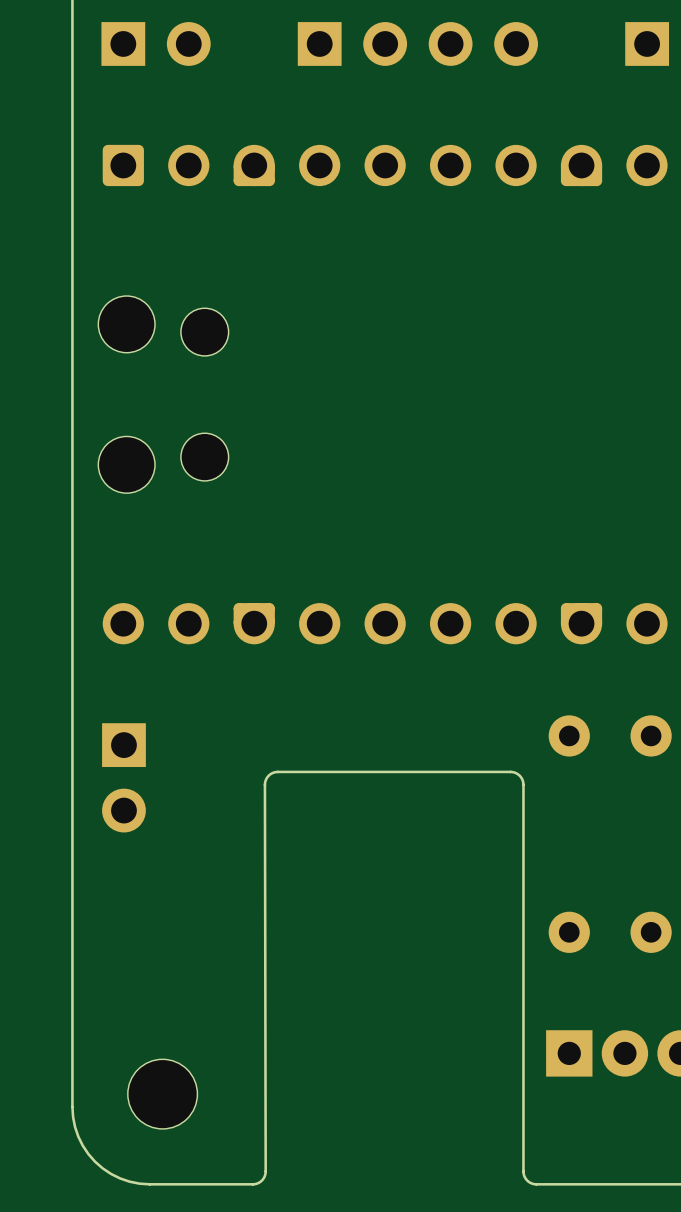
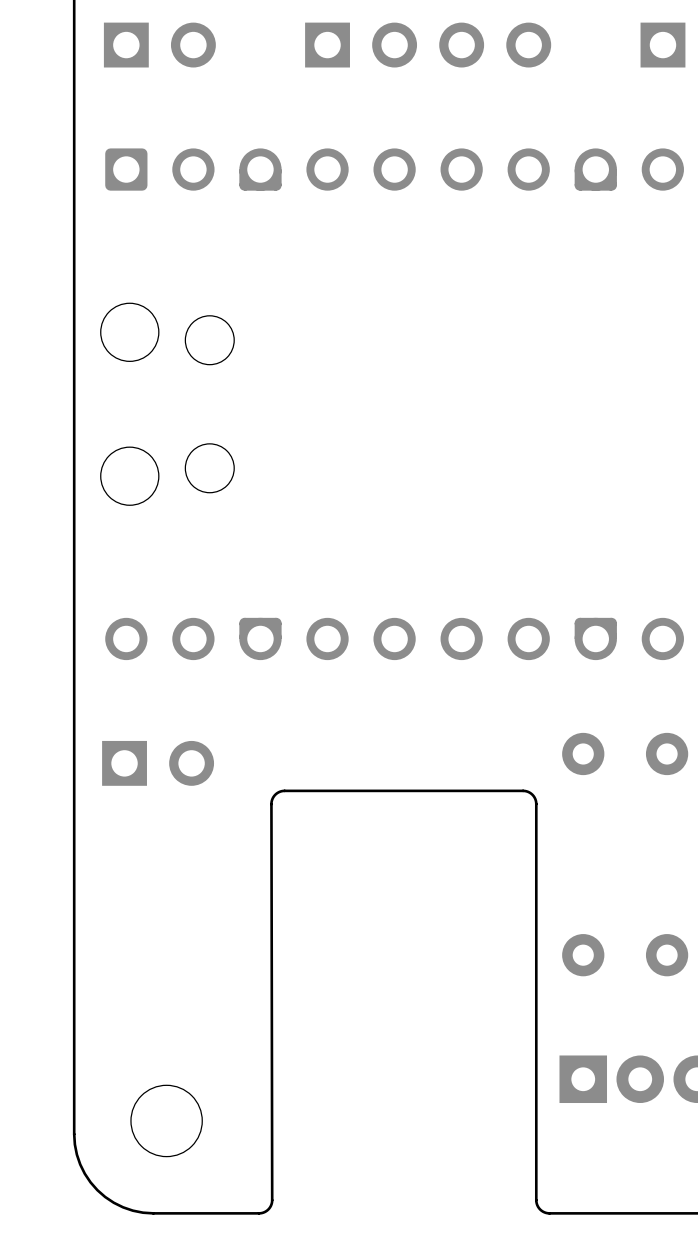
part rotation: 0° (123, 777) -> 90° counterclockwise (158, 763)

